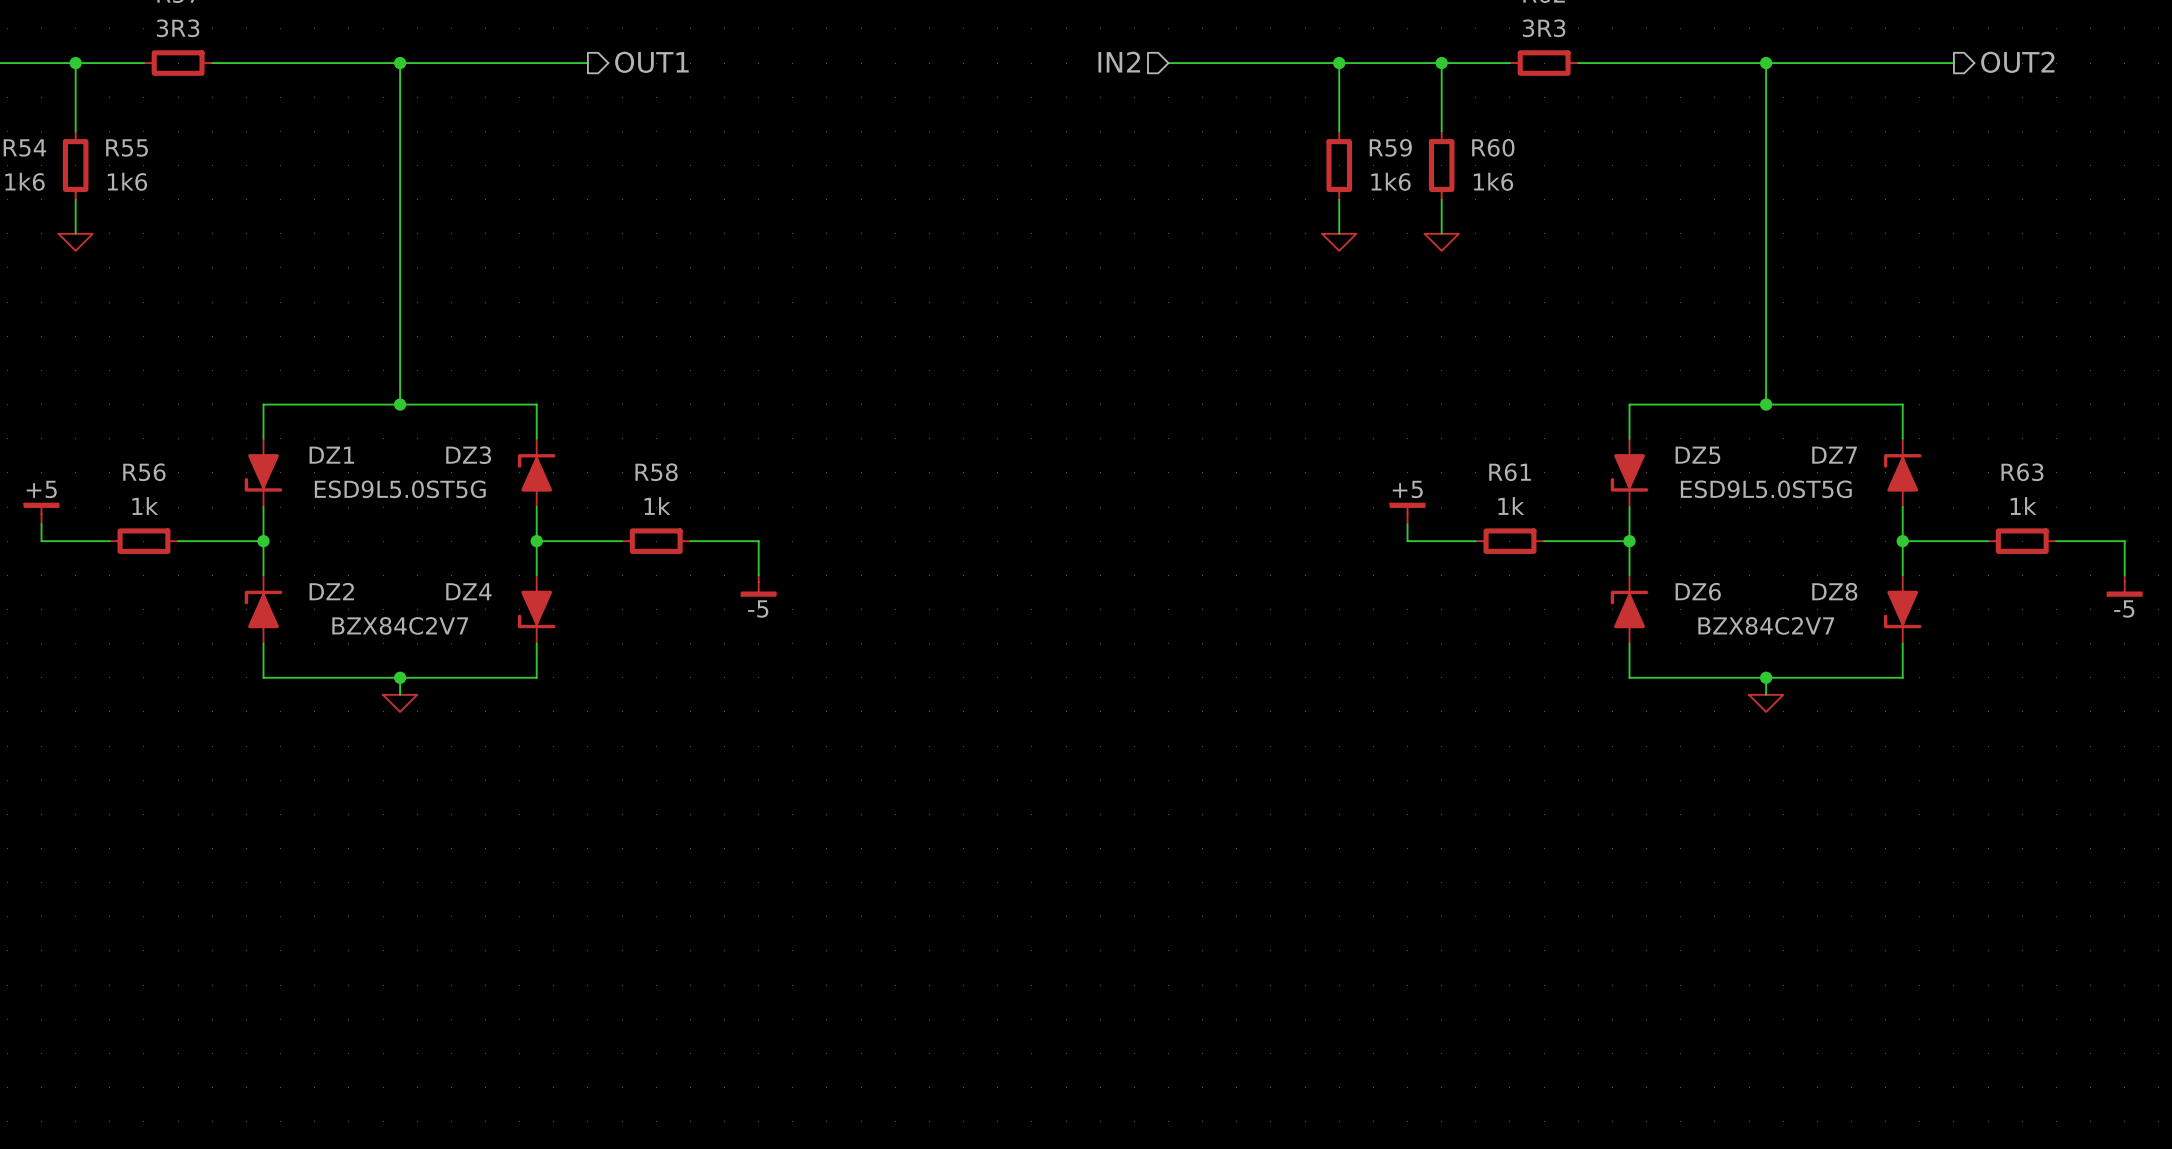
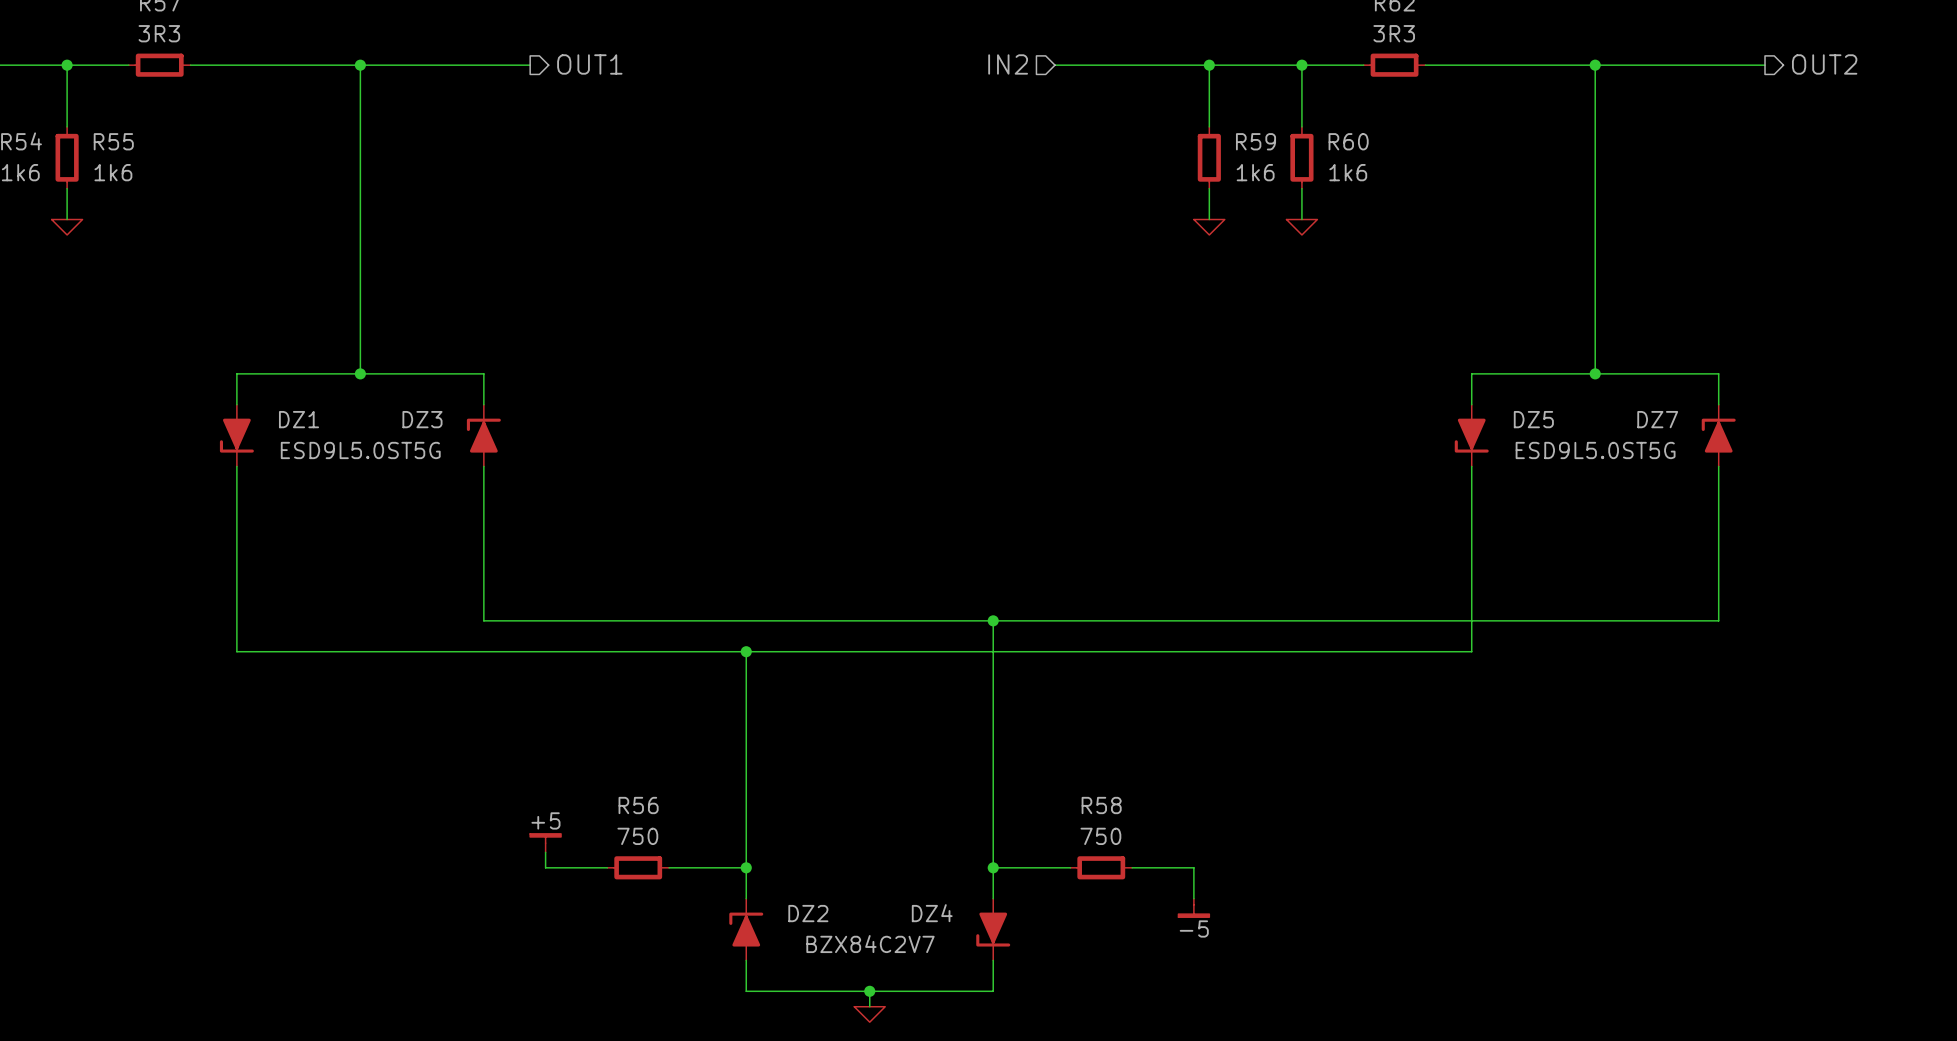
R56 value: 1k (145, 506) -> 750 (637, 836)
R58 value: 1k (657, 506) -> 750 (1100, 836)
power symbol: +5 (41, 513) -> none
power symbol: +5 (1407, 513) -> none
wire: (41, 524) (41, 541) (109, 541) -> none
wire: (1407, 524) (1407, 541) (1475, 541) -> none
R56 position: (143, 541) -> (638, 867)
wire: (178, 541) (263, 541) -> none
junction: (263, 541) -> none
wire: (536, 541) (622, 541) -> none
junction: (536, 541) -> none
R58 position: (656, 541) -> (1101, 867)
wire: (690, 541) (758, 541) (758, 575) -> none
R61: 1k (1509, 541) -> none
wire: (1544, 541) (1629, 541) -> none
junction: (1629, 541) -> none
wire: (1902, 541) (1988, 541) -> none
junction: (1902, 541) -> none
R63: 1k (2022, 541) -> none
wire: (2056, 541) (2124, 541) (2124, 575) -> none
power symbol: -5 (758, 585) -> none
power symbol: -5 (2124, 585) -> none
DZ2 position: (263, 609) -> (746, 929)
DZ4 position: (536, 609) -> (993, 929)
DZ6: BZX84C2V7 (1629, 609) -> none
DZ8: (1902, 609) -> none
wire: (263, 677) (536, 677) -> (236, 620) (236, 651) (1471, 651) (1471, 620) (483, 620)
wire: (400, 677) (400, 694) -> none
junction: (400, 677) -> none
wire: none -> (993, 620) (993, 898)
junction: none -> (993, 620)
wire: (1766, 677) (1766, 694) -> none
junction: (1766, 677) -> none
power symbol: (400, 703) -> none
power symbol: (1766, 703) -> none
wire: none -> (746, 651) (746, 898)
junction: none -> (746, 651)
power symbol: none -> +5 (545, 843)
wire: none -> (545, 852) (545, 867) (607, 867)
wire: none -> (669, 867) (746, 867)
junction: none -> (746, 867)
wire: none -> (993, 867) (1070, 867)
junction: none -> (993, 867)
wire: none -> (1132, 867) (1193, 867) (1193, 898)
power symbol: none -> -5 (1193, 907)
wire: none -> (746, 960) (746, 991) (993, 991) (993, 960)
wire: none -> (869, 991) (869, 1006)
junction: none -> (869, 991)
power symbol: none -> (869, 1014)

